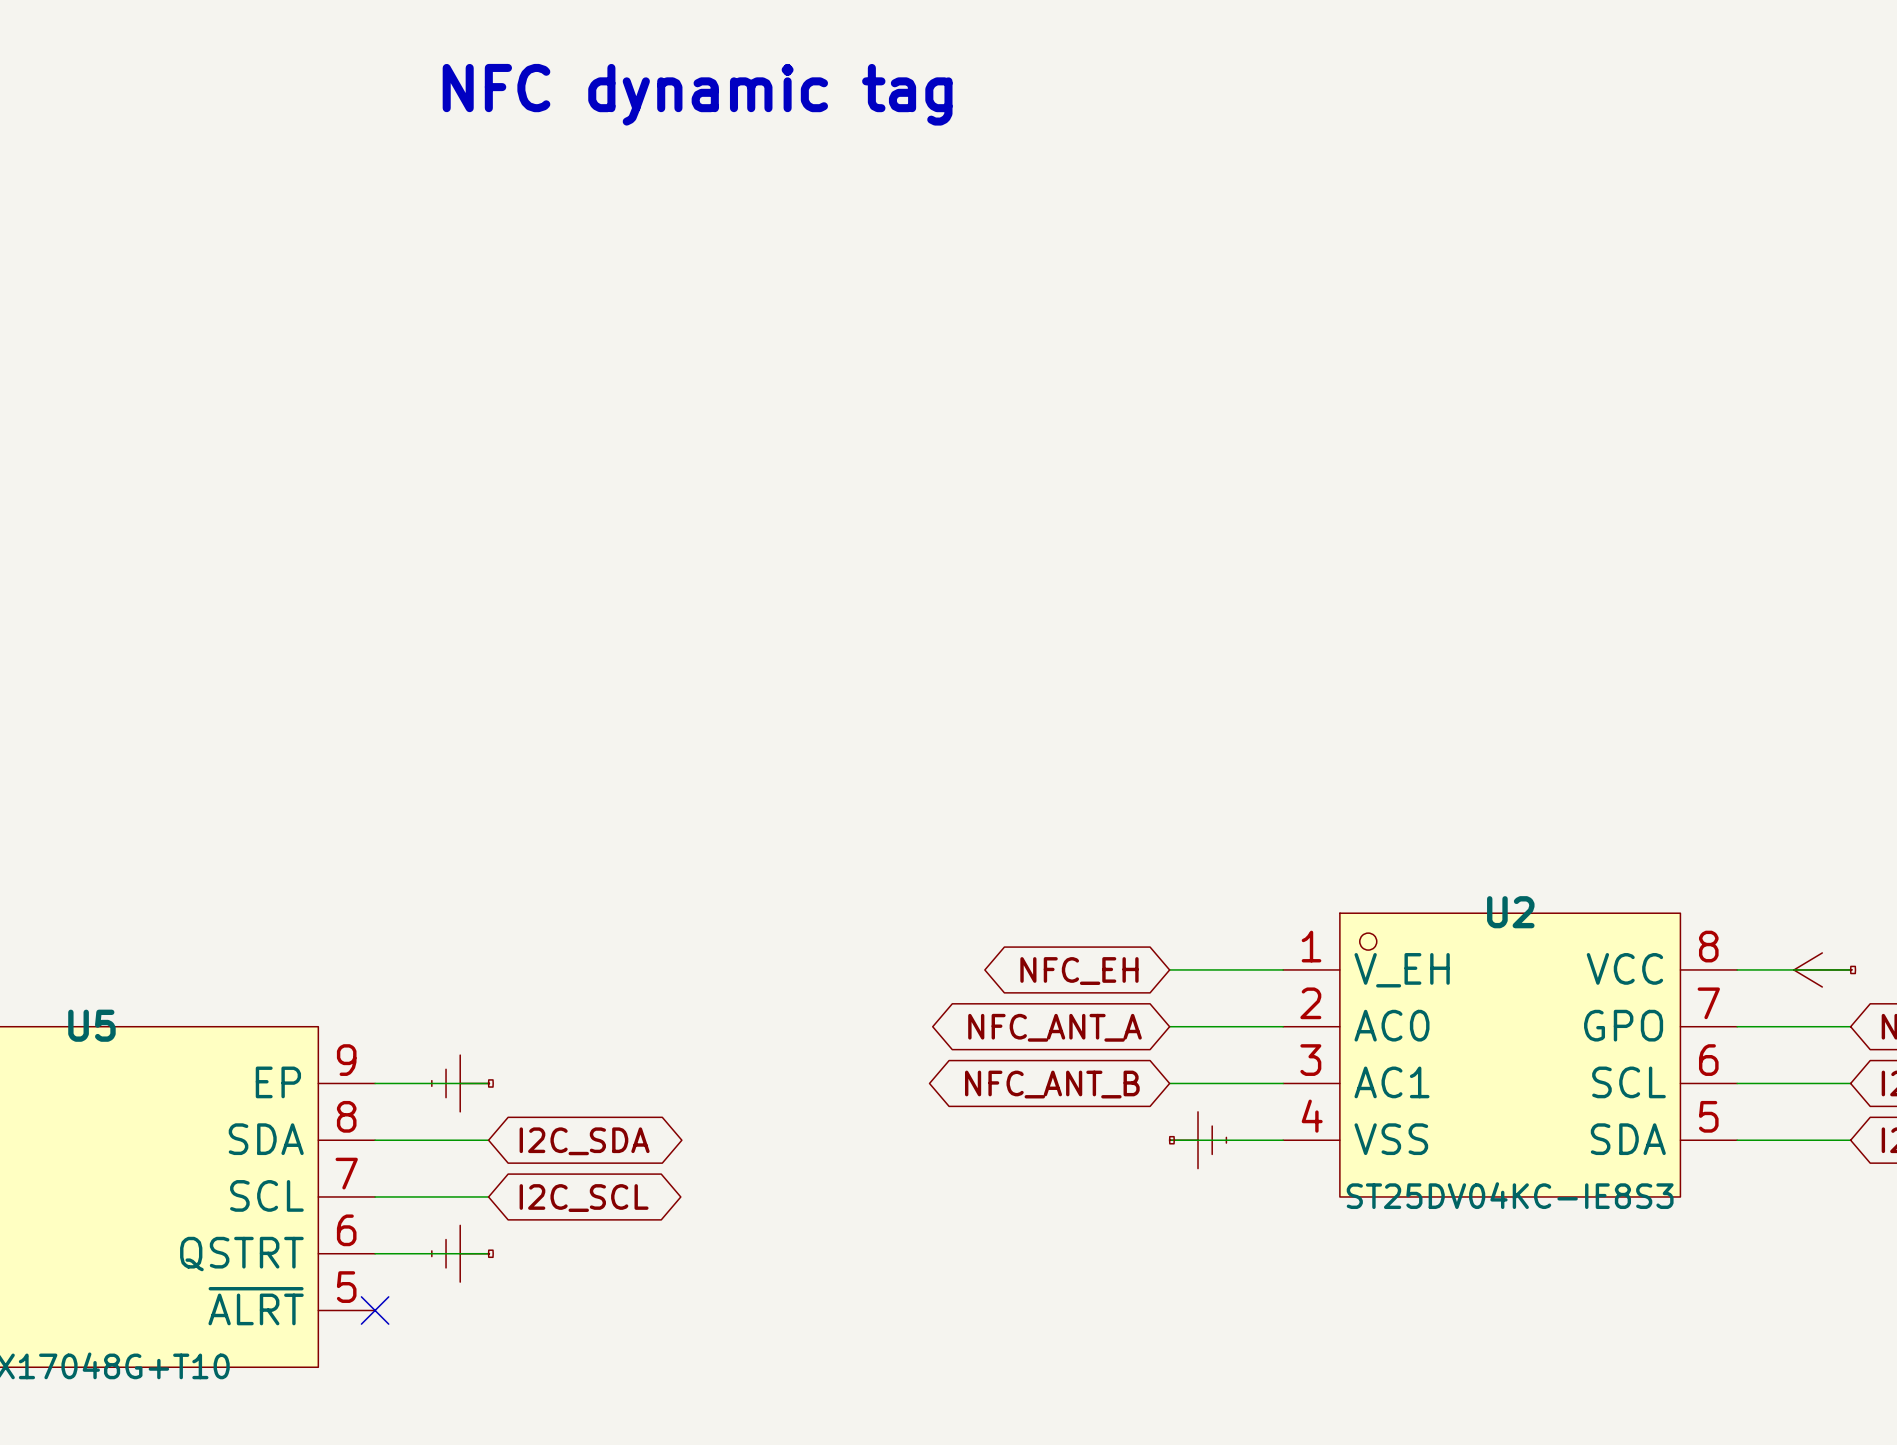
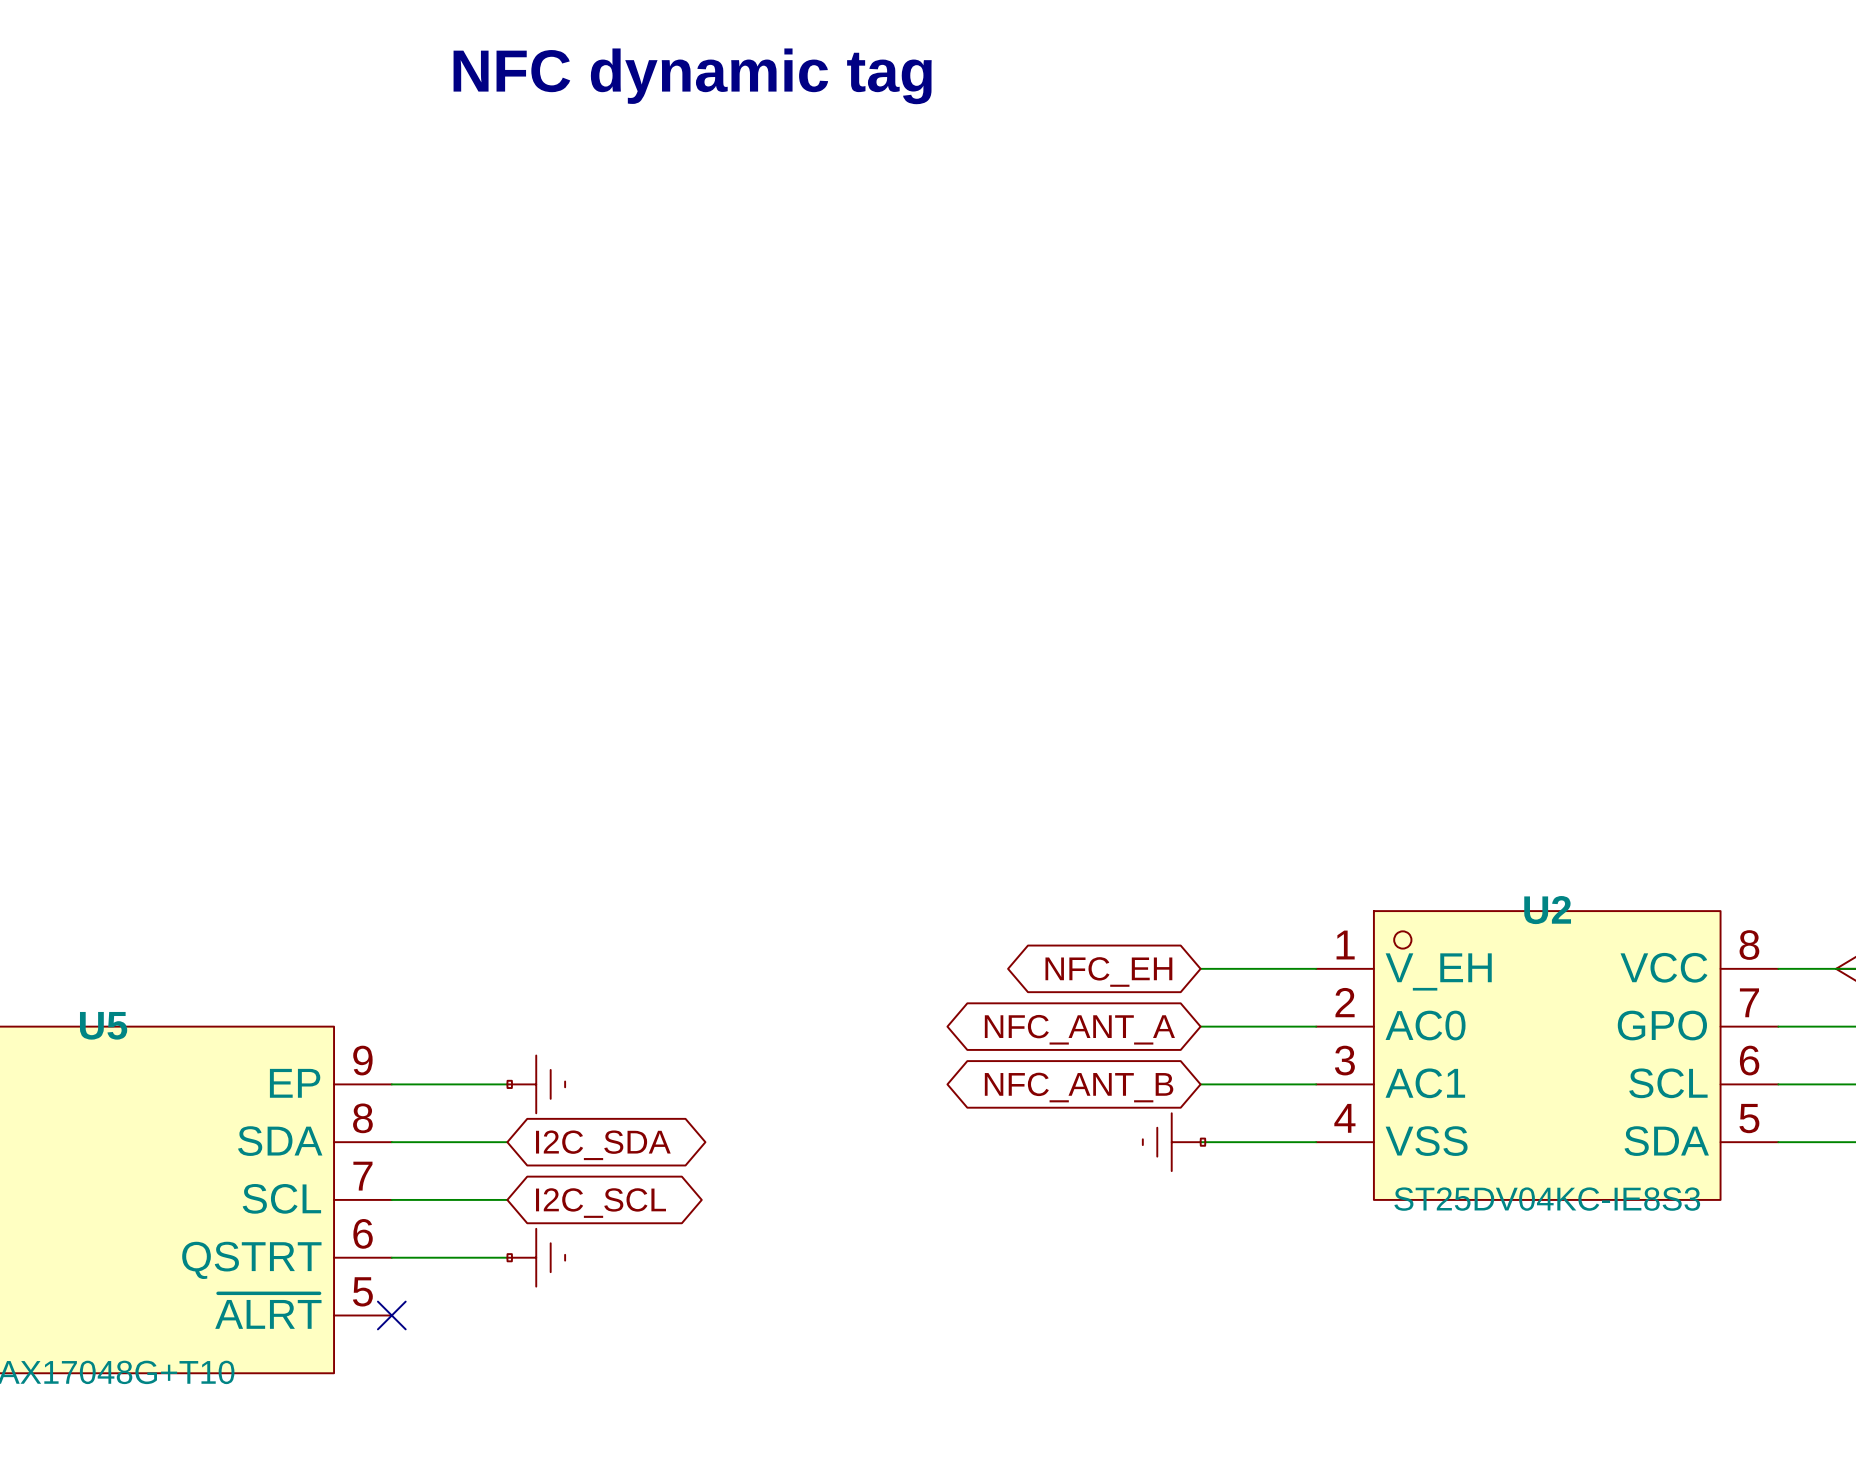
power symbol rotation: 0° (460, 1083) -> 180° (536, 1084)
power symbol position: (460, 1083) -> (536, 1084)
power symbol rotation: 0° (1198, 1140) -> 180° (1171, 1142)
power symbol position: (1198, 1140) -> (1171, 1142)
power symbol rotation: 0° (460, 1253) -> 180° (536, 1257)
power symbol position: (460, 1253) -> (536, 1257)

